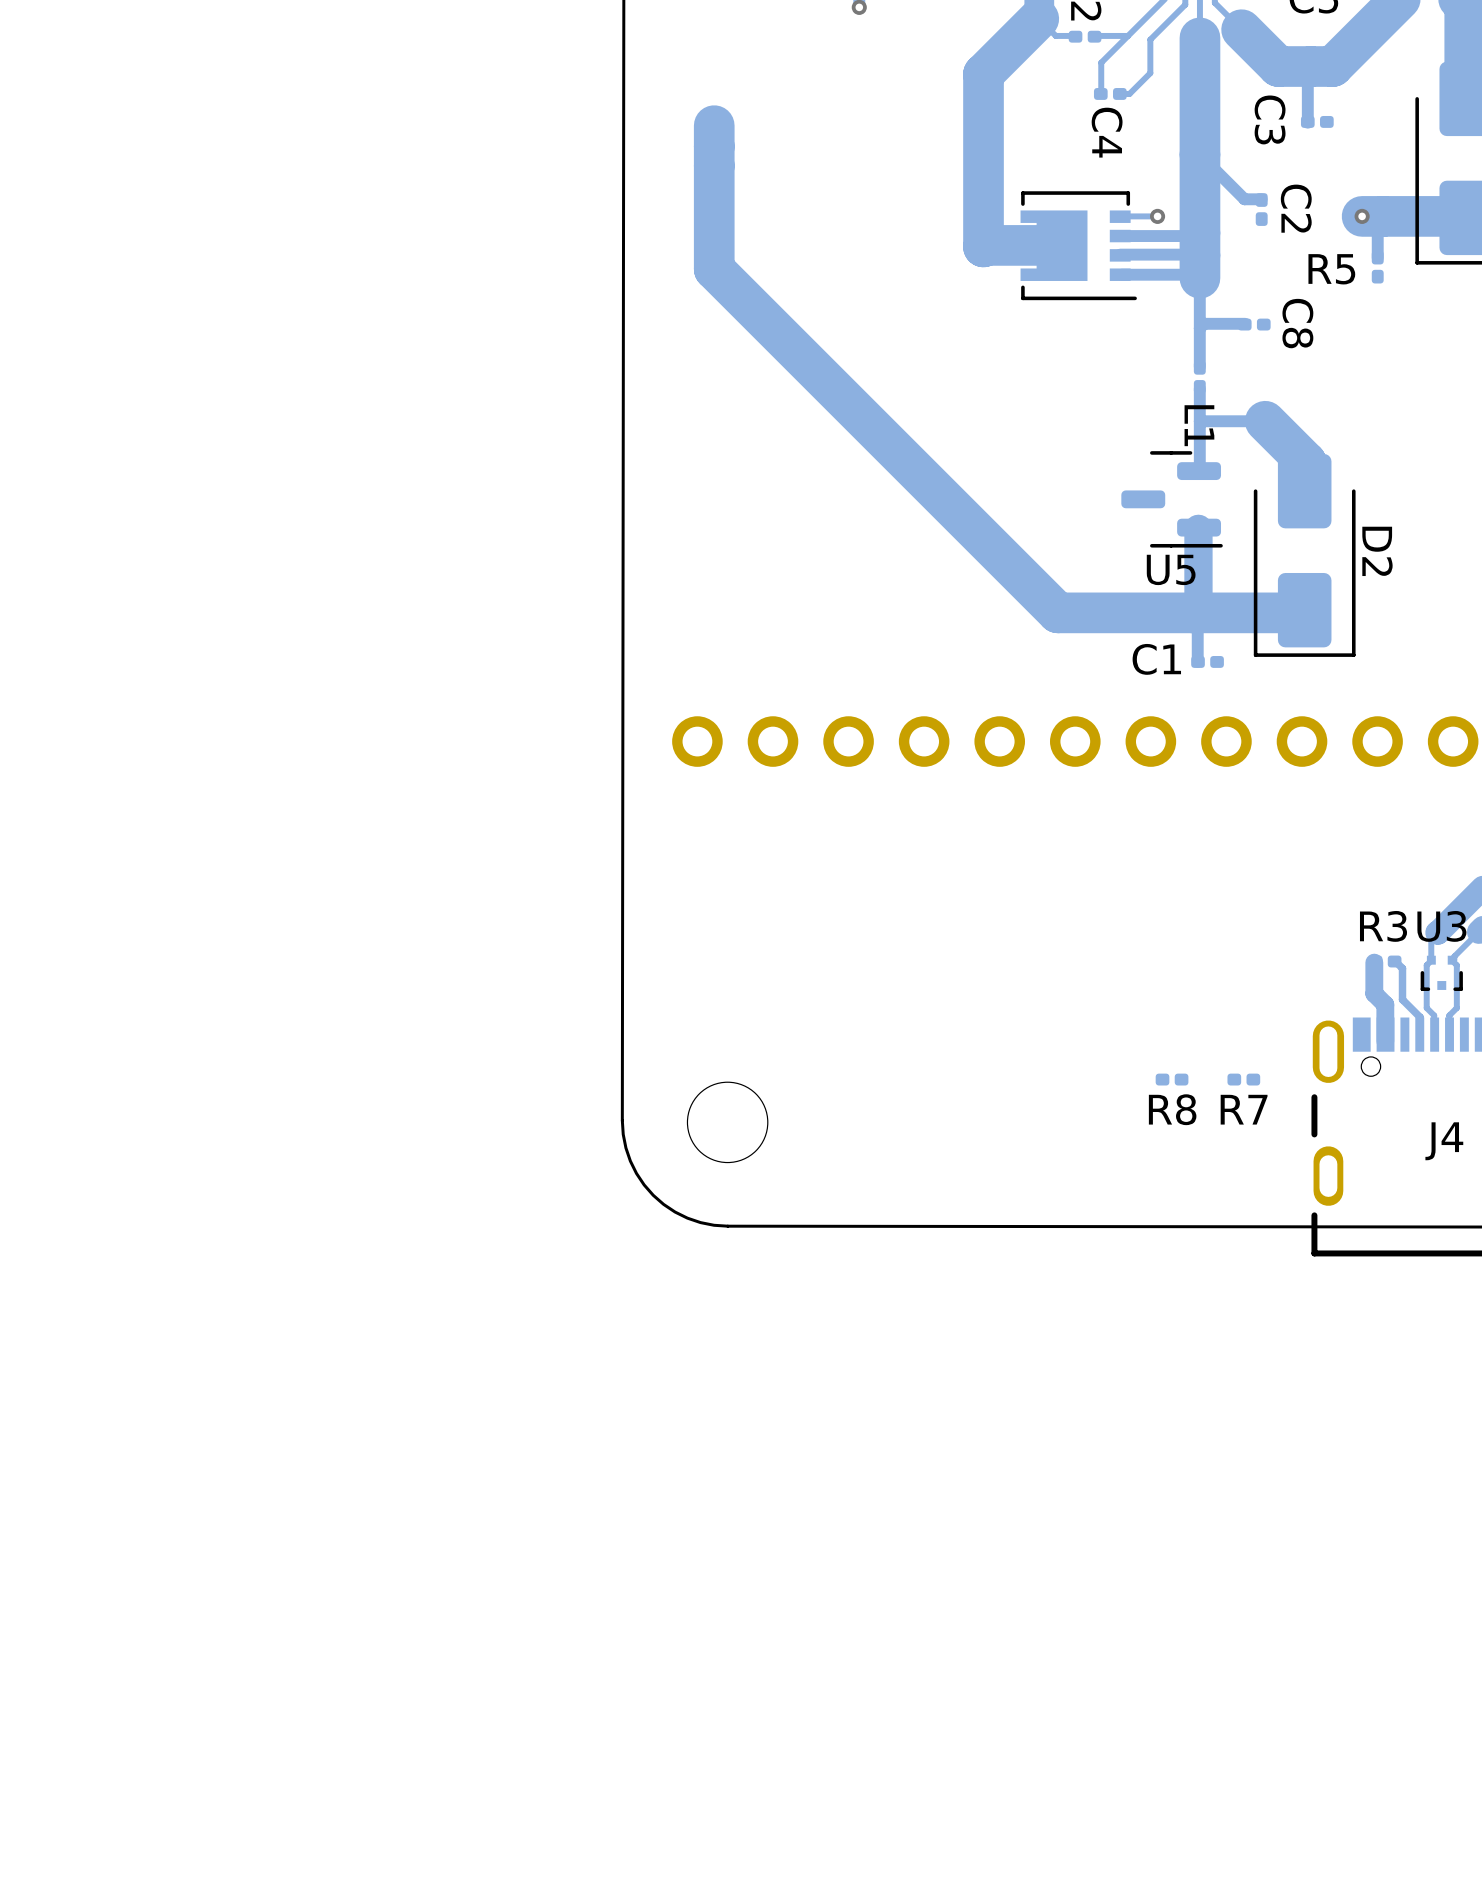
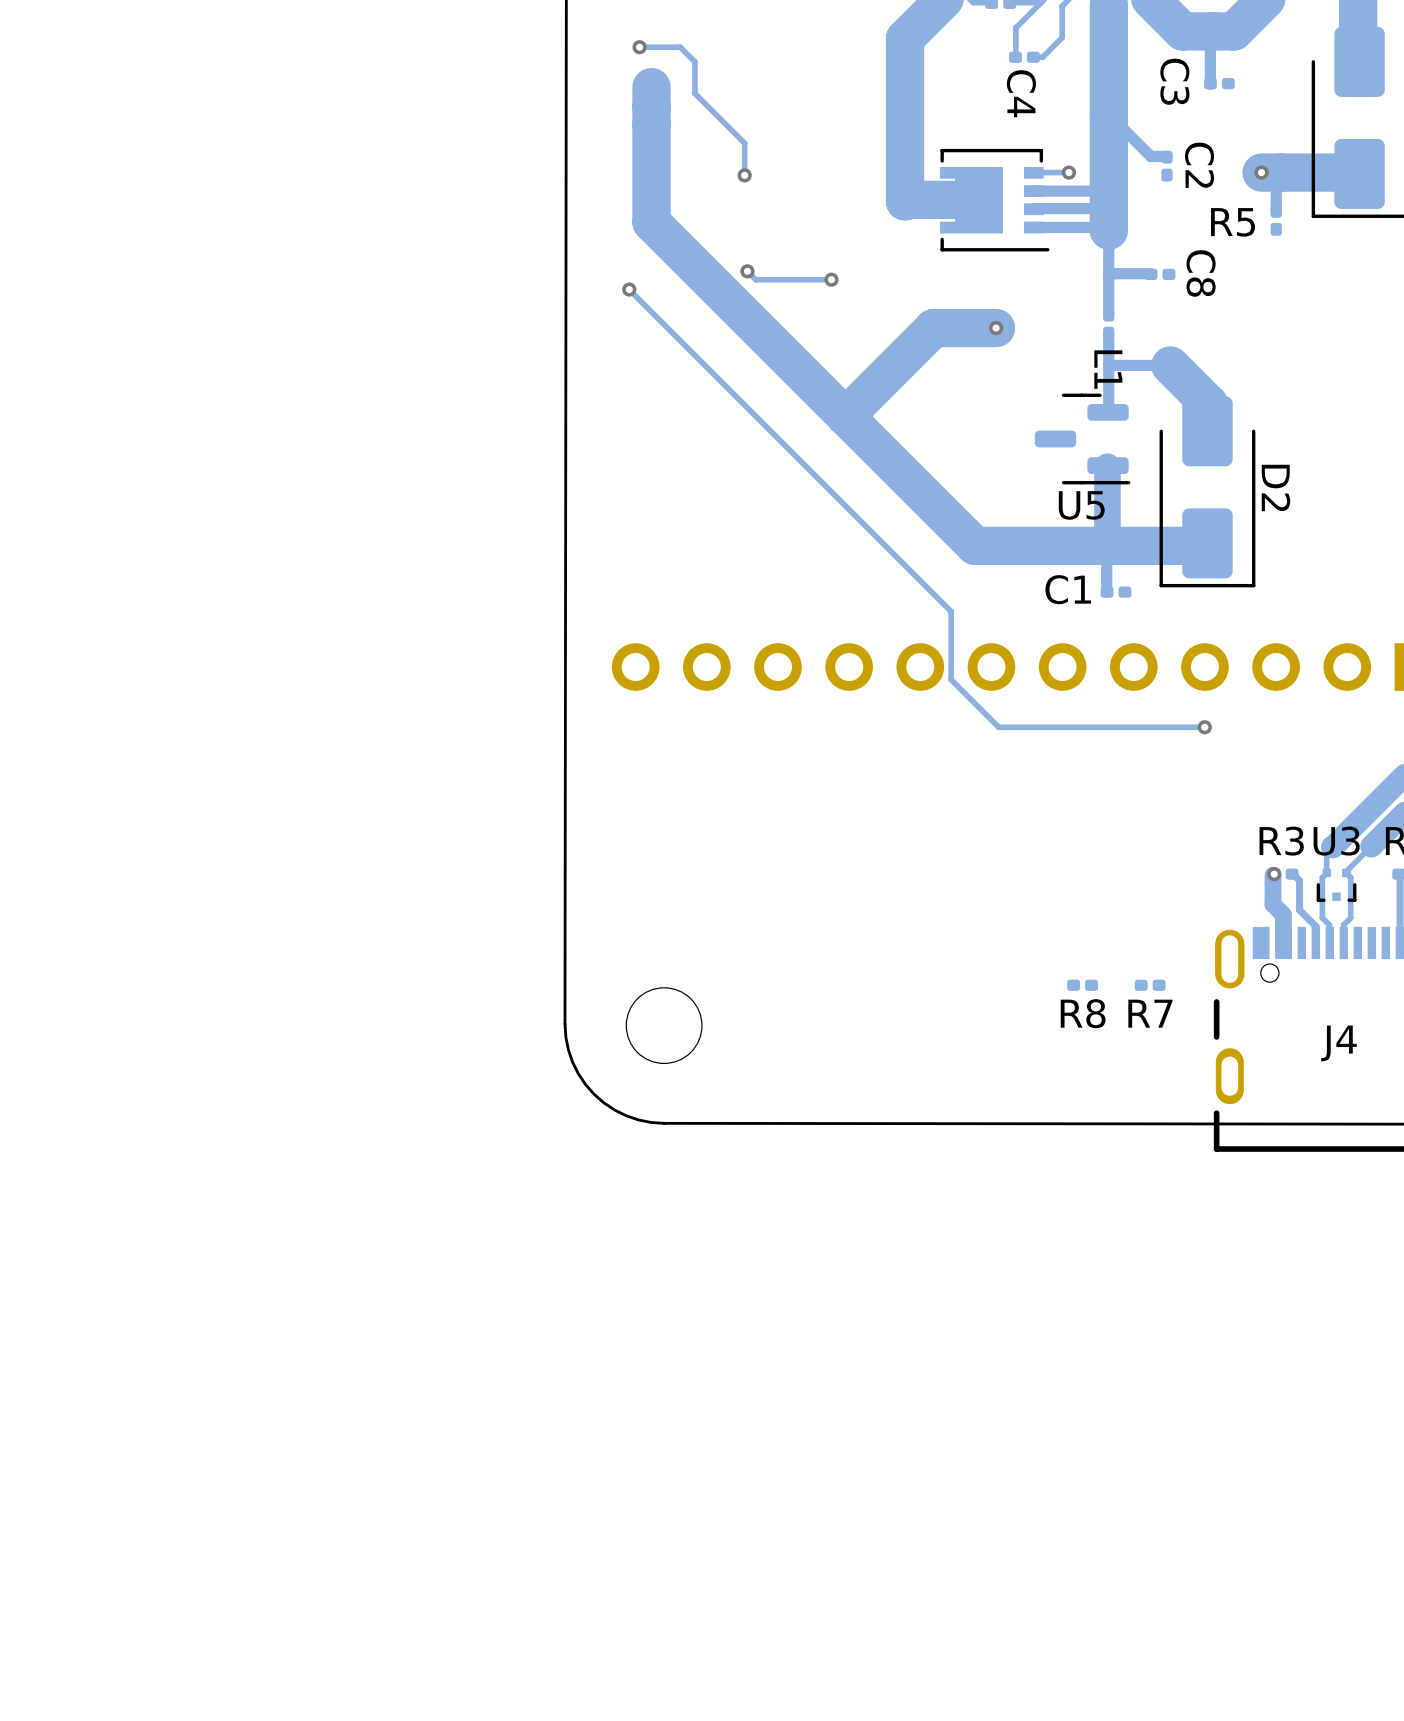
track: none -> (639, 47) (680, 47) (694, 61) (694, 93) (744, 143) (744, 175)
via: none -> (639, 47)
via: none -> (744, 175)
track: none -> (747, 271) (755, 279) (831, 279)
via: none -> (747, 271)
via: none -> (831, 279)
track: none -> (629, 289) (951, 611) (951, 679) (998, 727) (1204, 727)
via: none -> (629, 289)
track: none -> (996, 328) (933, 328) (845, 416)
via: none -> (996, 328)
via: none -> (1204, 727)
via: none -> (1274, 874)

